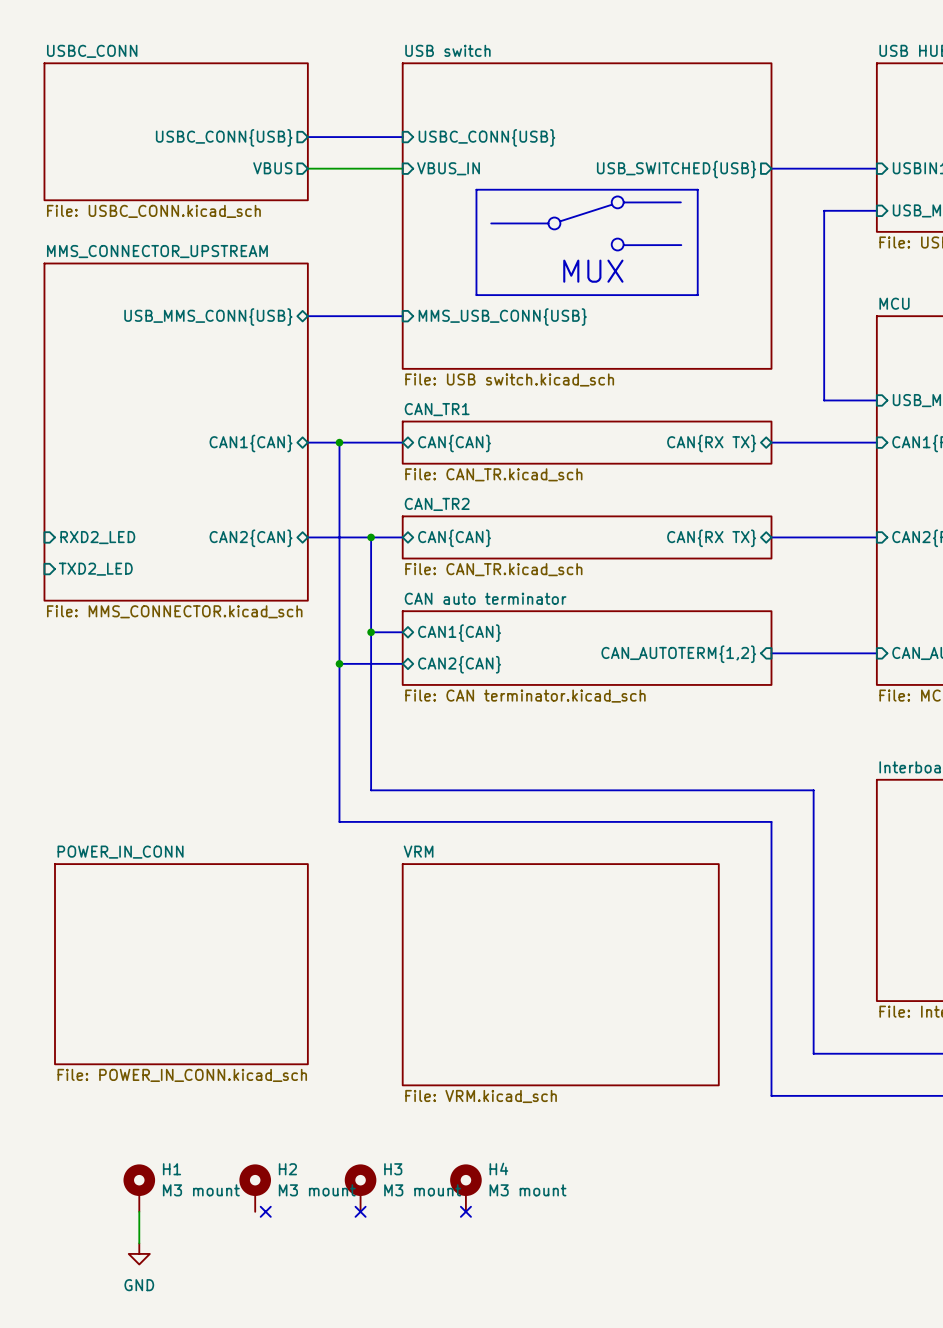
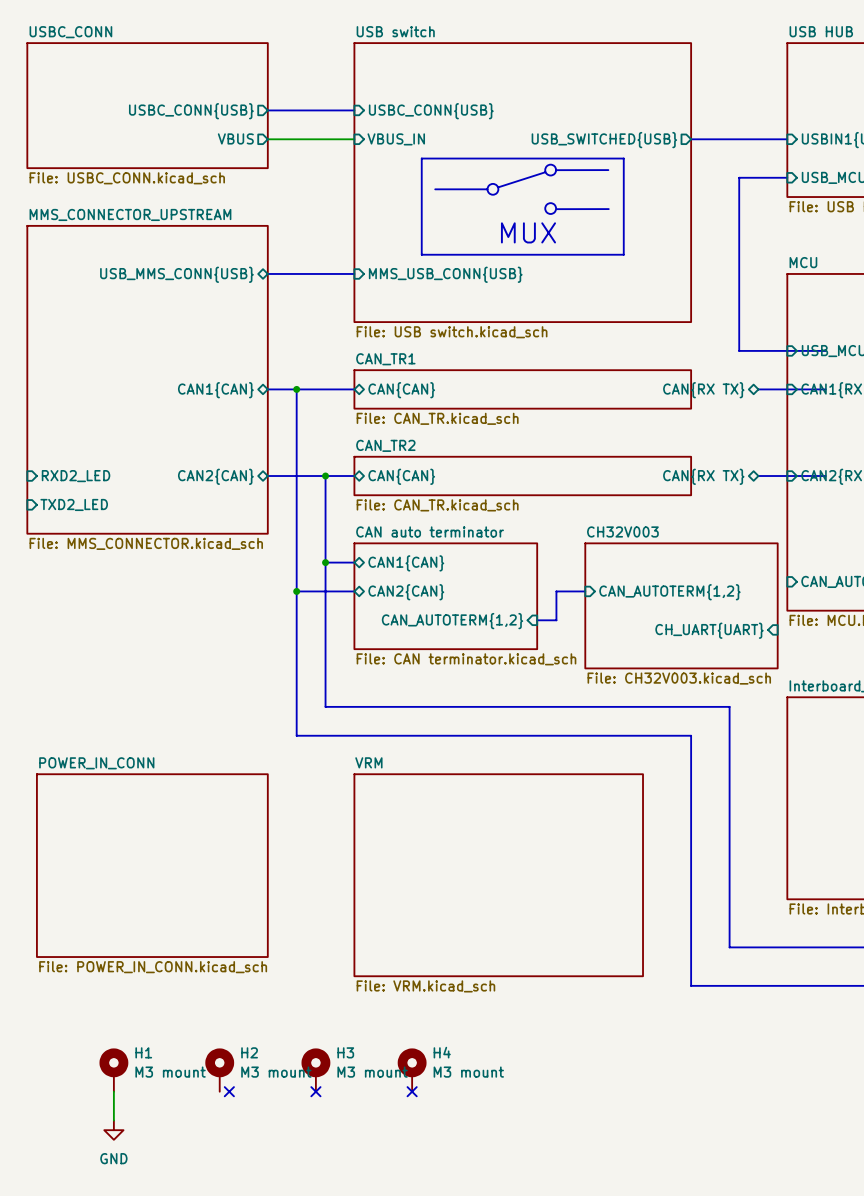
bus: none -> (787, 350) (825, 350)
bus: (771, 442) (845, 442) -> none
bus: none -> (787, 389) (825, 389)
sheet pin position: CAN{RX TX} (711, 443) -> CAN{RX TX} (703, 390)
bus: (771, 537) (845, 537) -> none
bus: none -> (787, 476) (825, 476)
sheet pin position: CAN{RX TX} (711, 538) -> CAN{RX TX} (703, 476)
sheet CAN auto terminator: File: CAN terminator.kicad_sch (587, 648) -> none
bus: (771, 653) (876, 653) -> none
sheet pin rotation: 0° (678, 654) -> 180° (669, 592)
bus: none -> (585, 591) (556, 591) (556, 620) (537, 620)
sheet CAN auto terminator: none -> File: CAN terminator.kicad_sch (445, 596)
sheet CH32V003: none -> File: CH32V003.kicad_sch (681, 605)
sheet pin: none -> CAN_AUTOTERM{1,2} (452, 621)
sheet pin: none -> CH_UART{UART} (709, 630)

